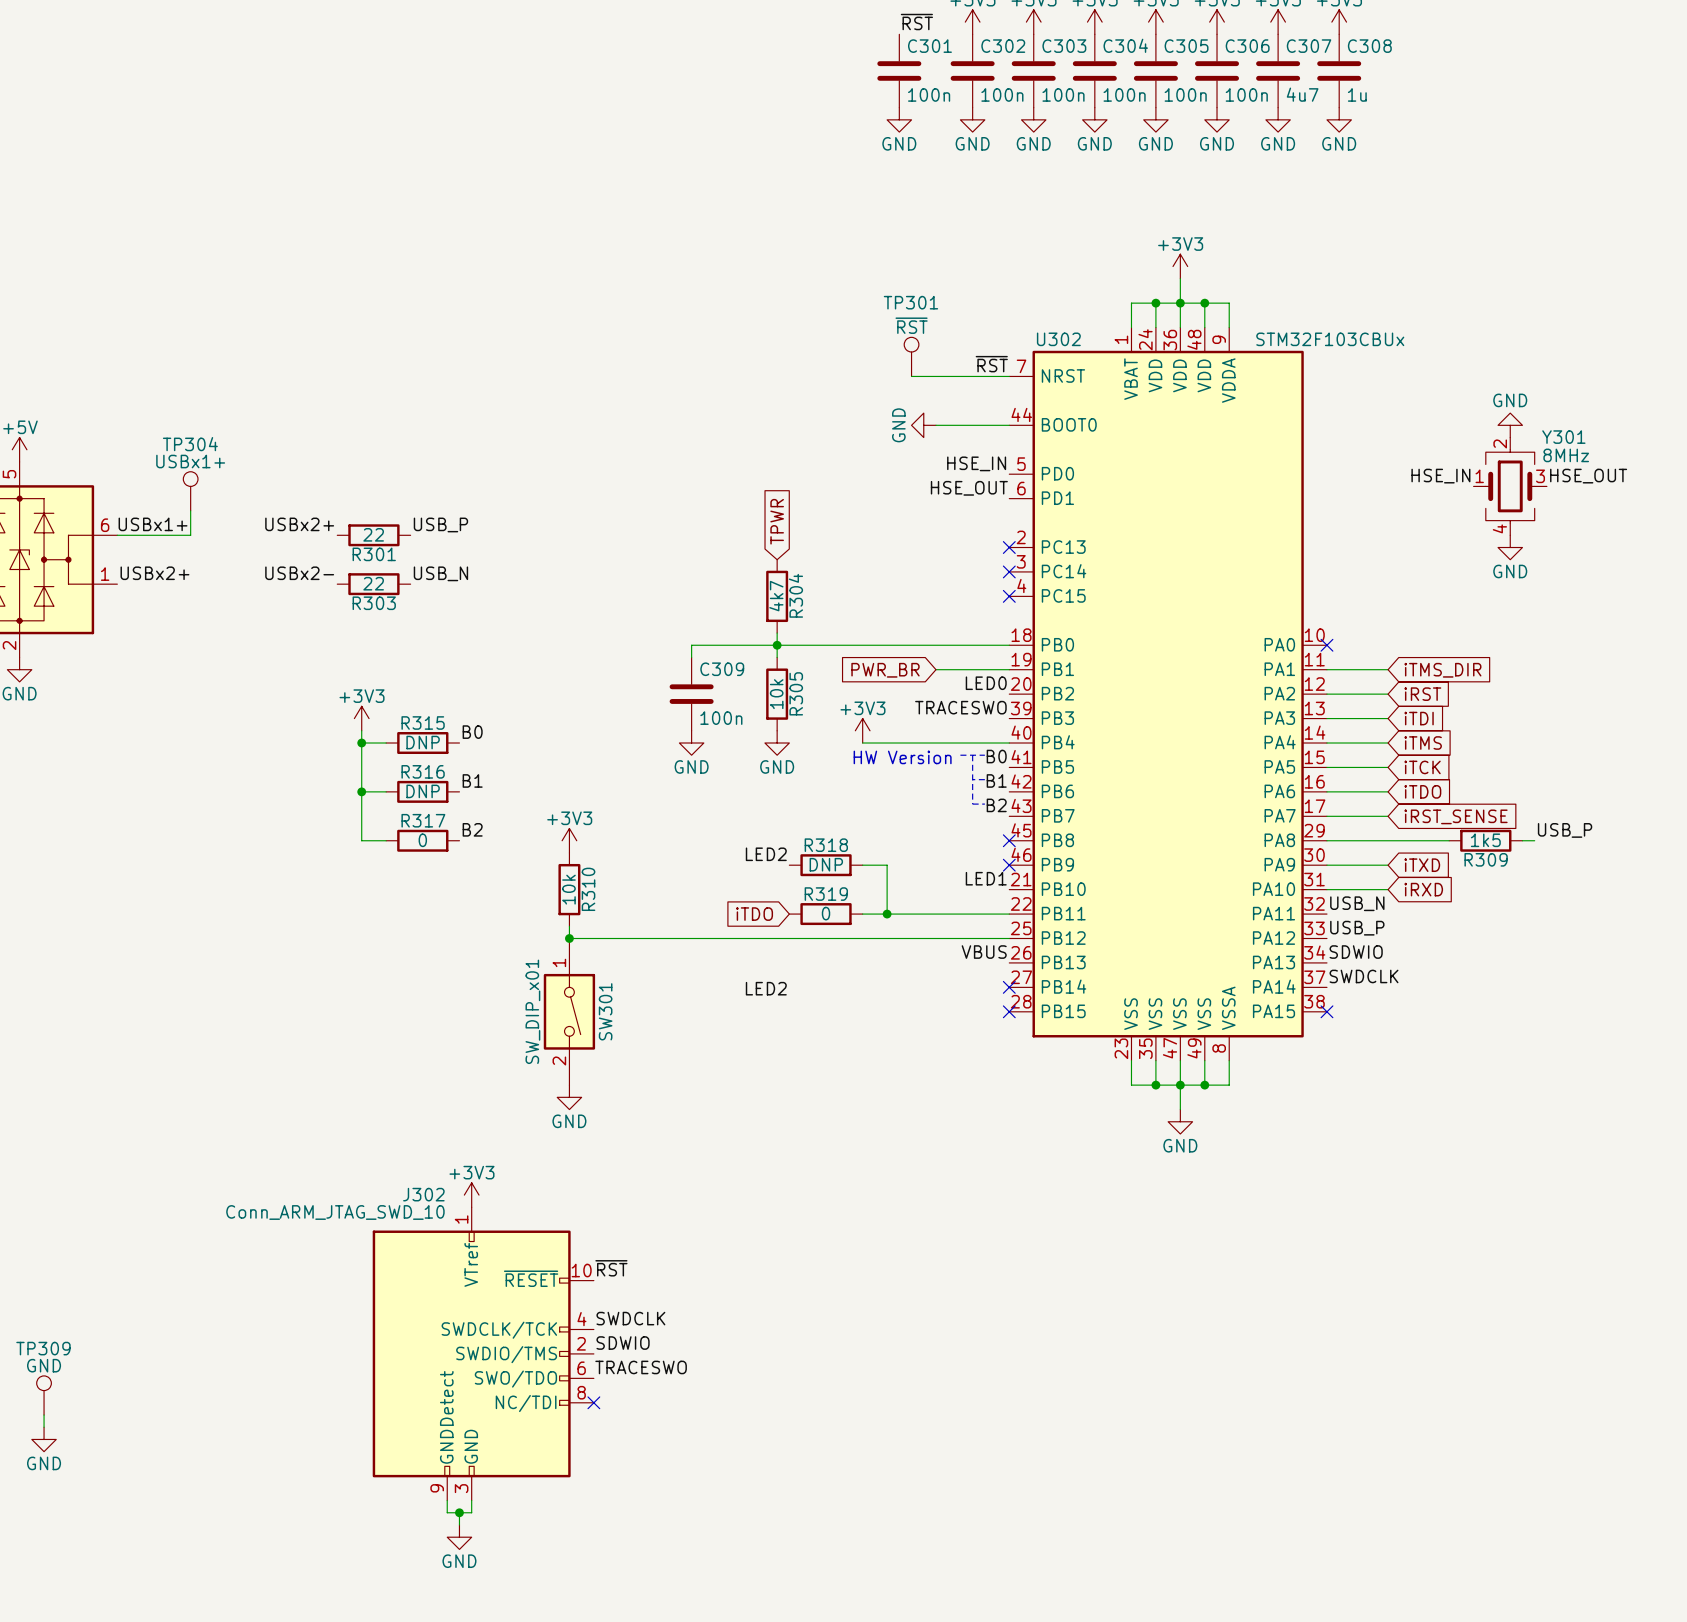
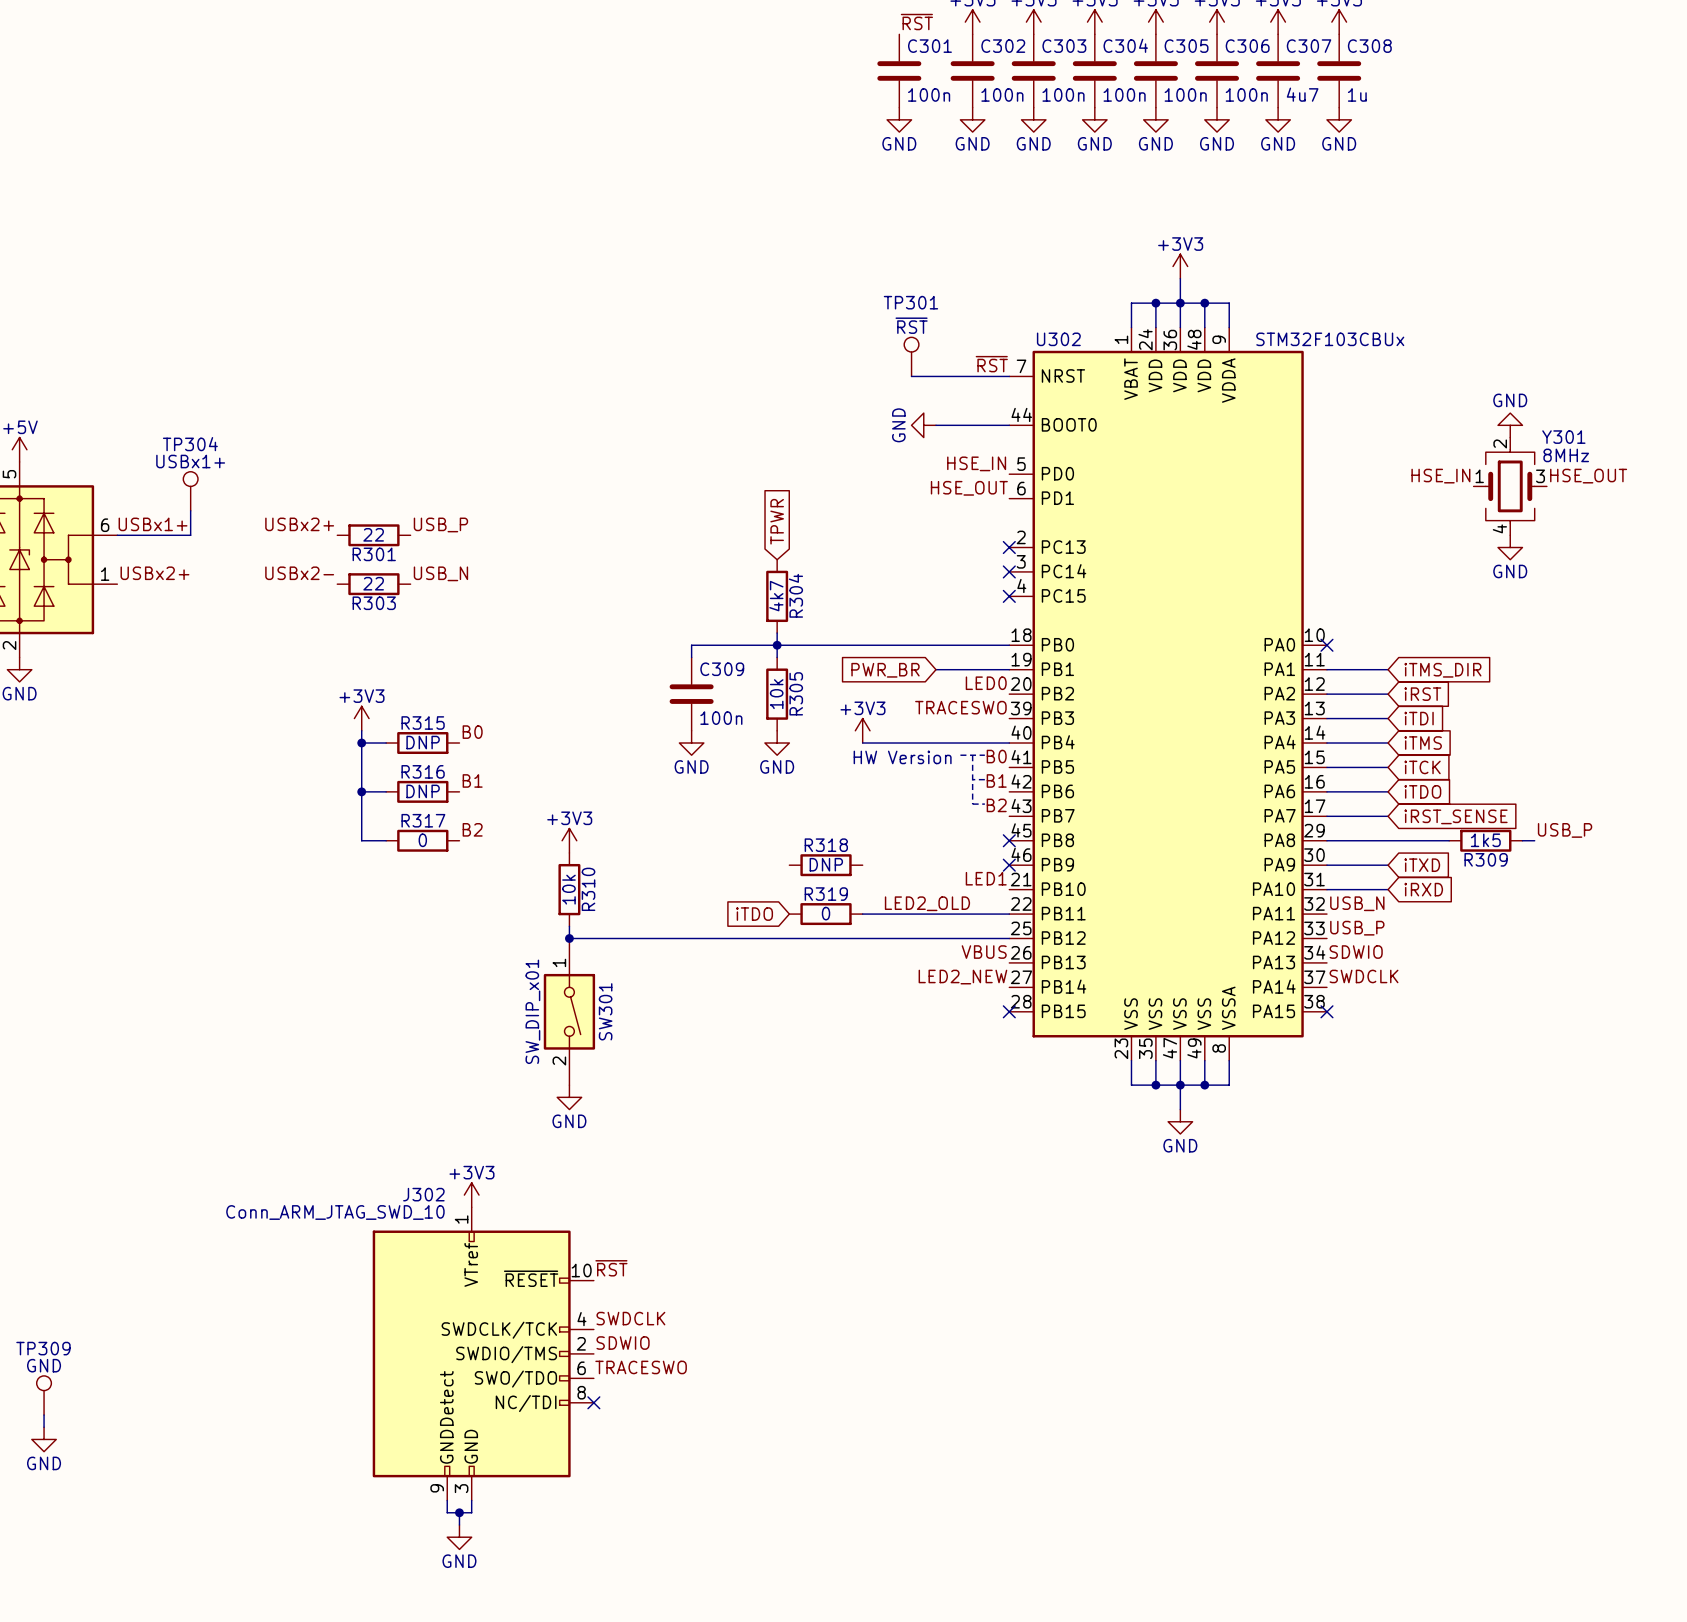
label: LED2 (766, 854) -> none
wire: (862, 865) (887, 865) (887, 914) -> none
label: none -> LED2_OLD (927, 903)
junction: (887, 914) -> none
label: none -> LED2_NEW (962, 977)
no-connect mark: (1009, 987) -> none
label: LED2 (766, 988) -> none

